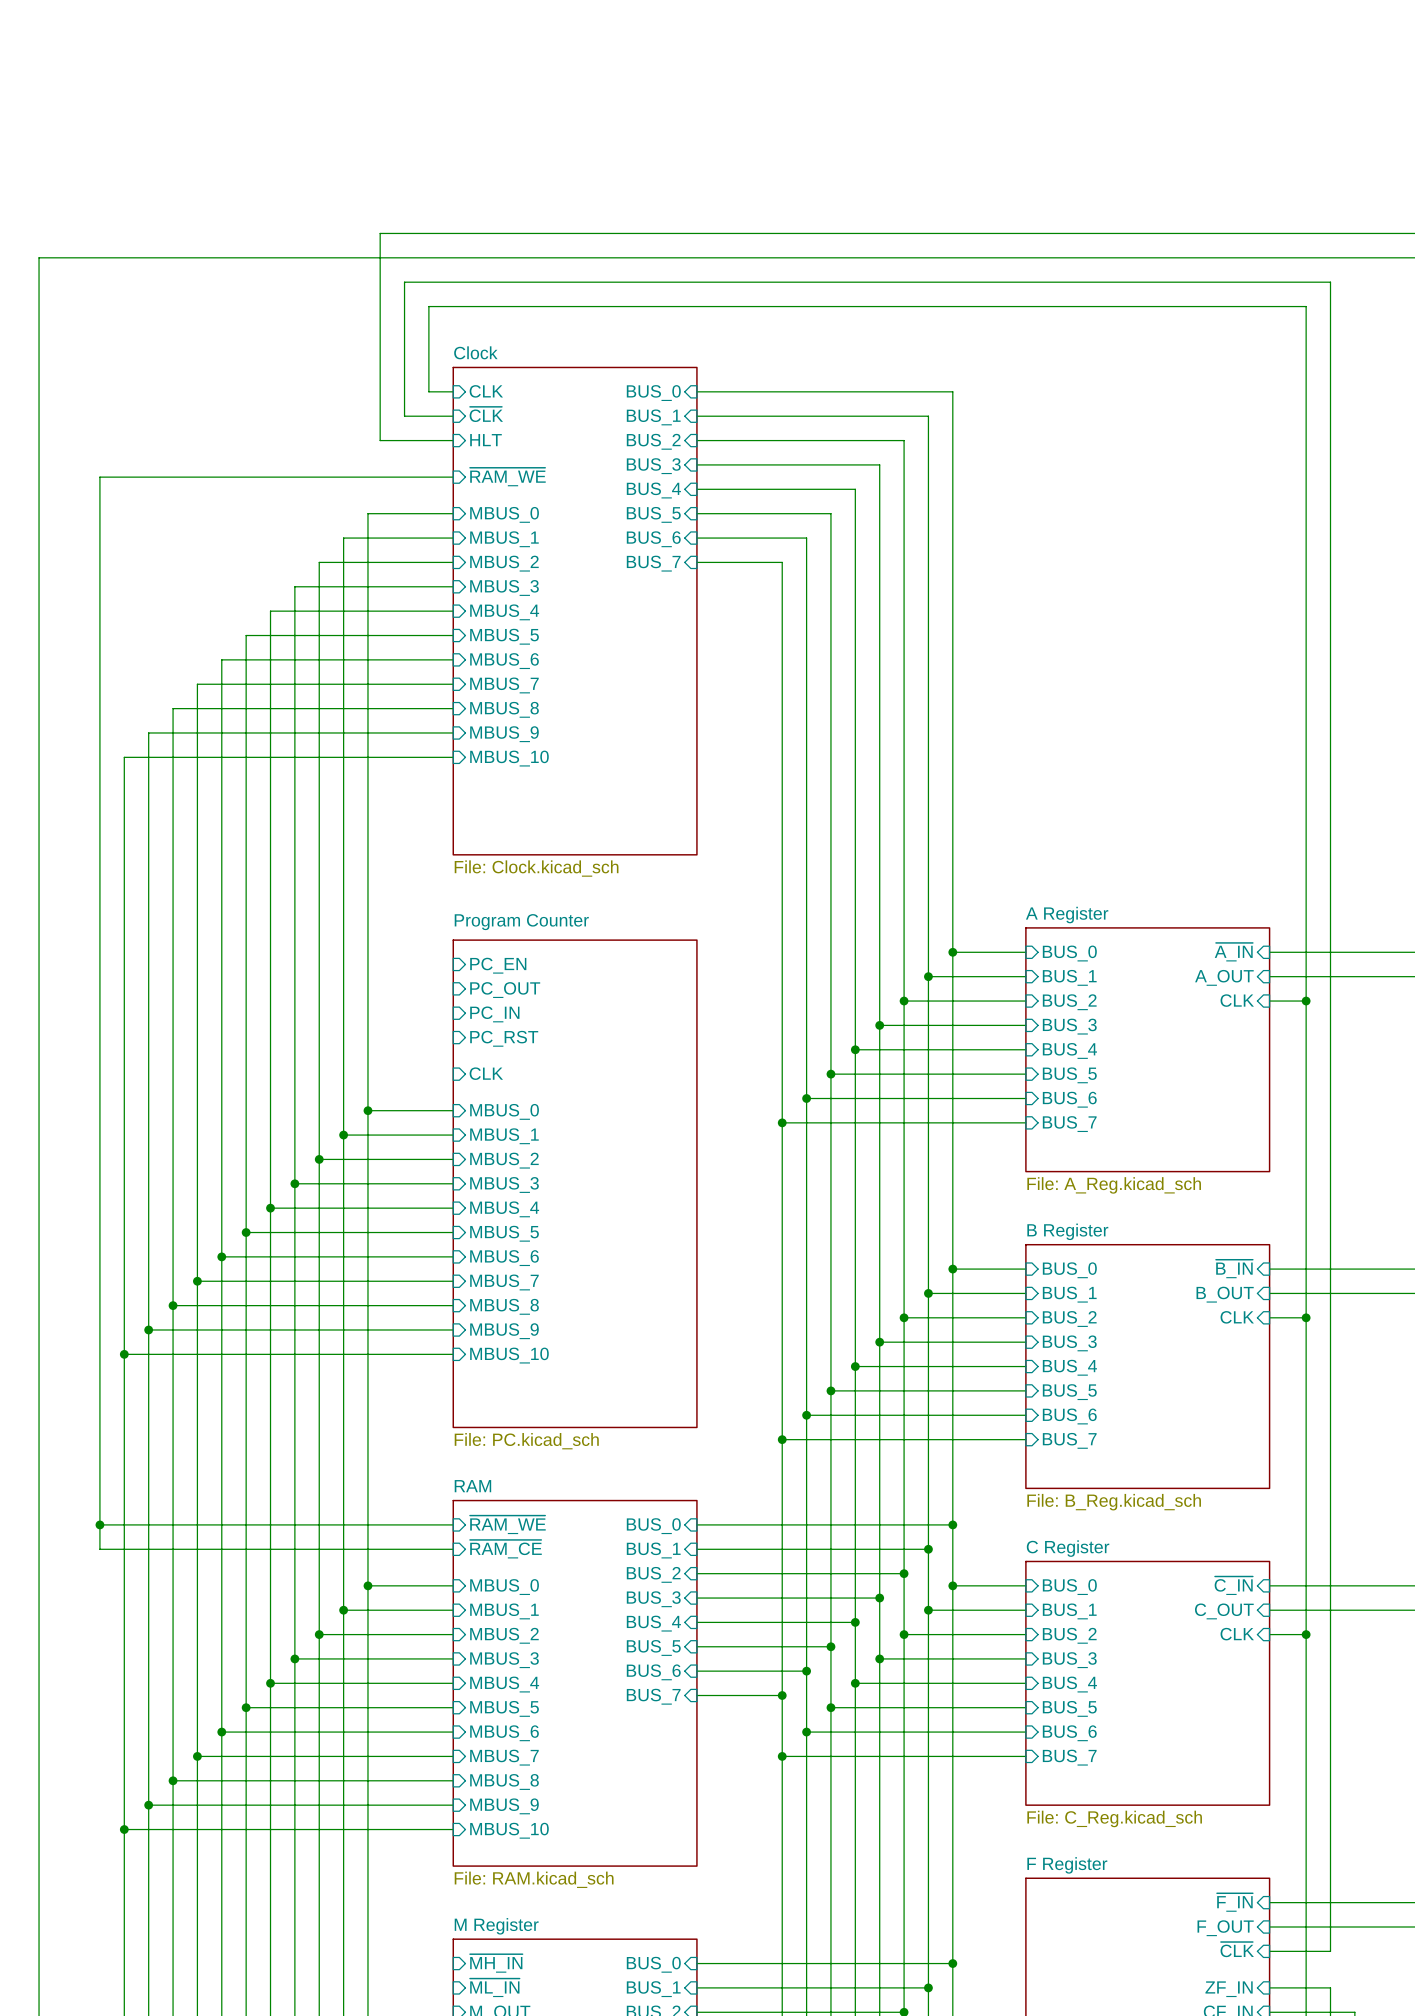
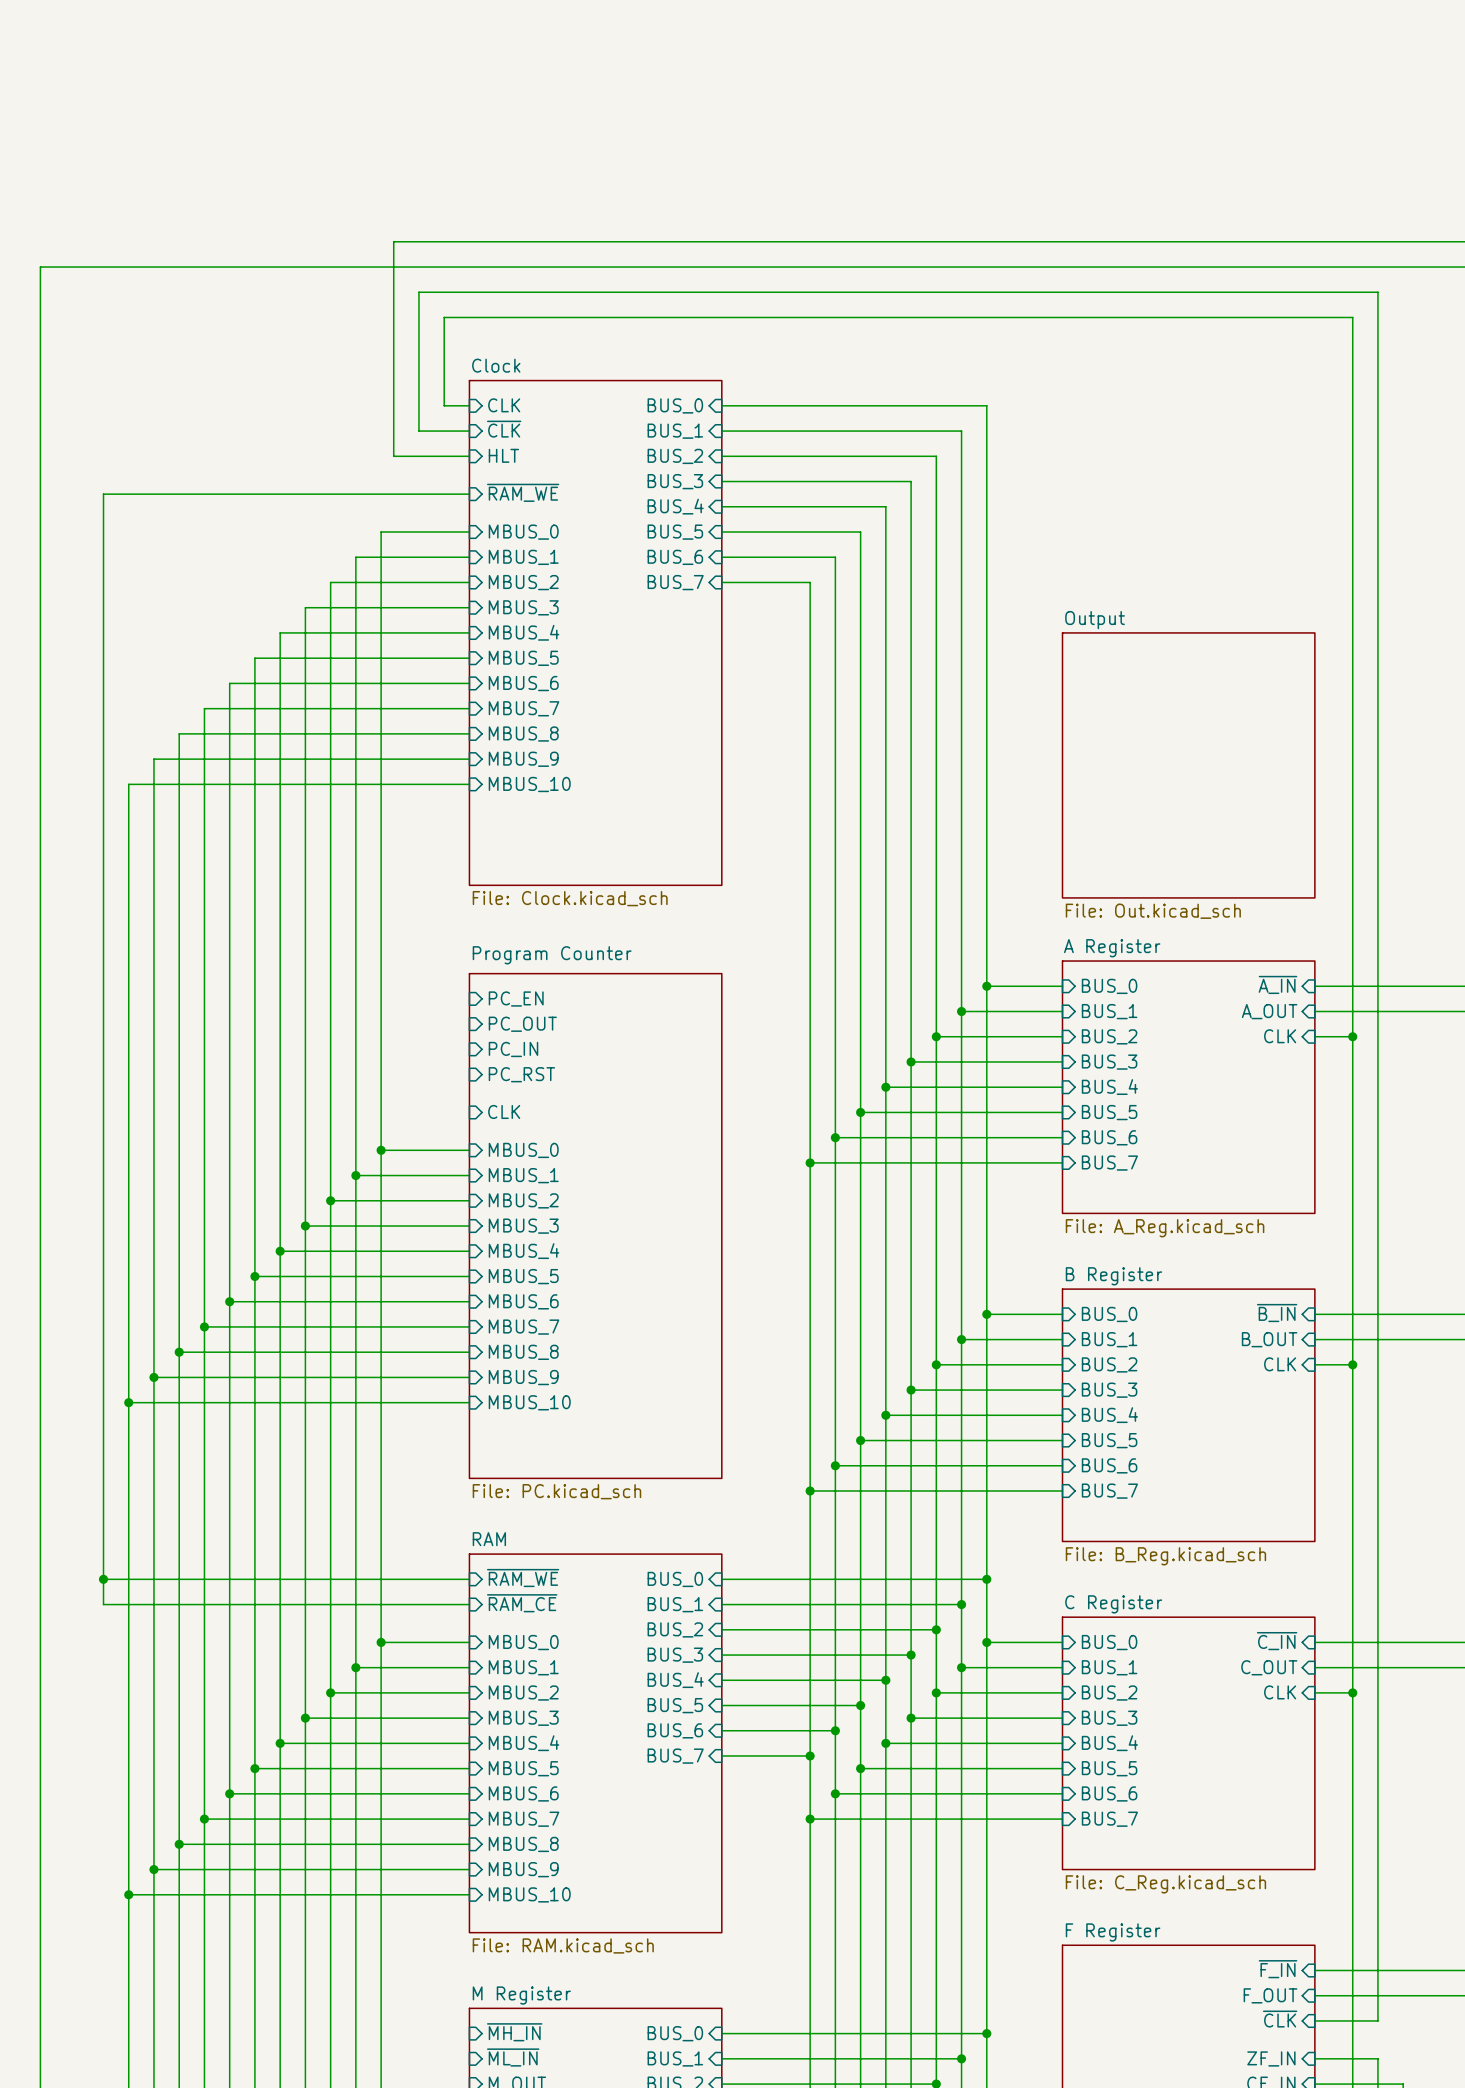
sheet Output: none -> File: Out.kicad_sch (1188, 765)

